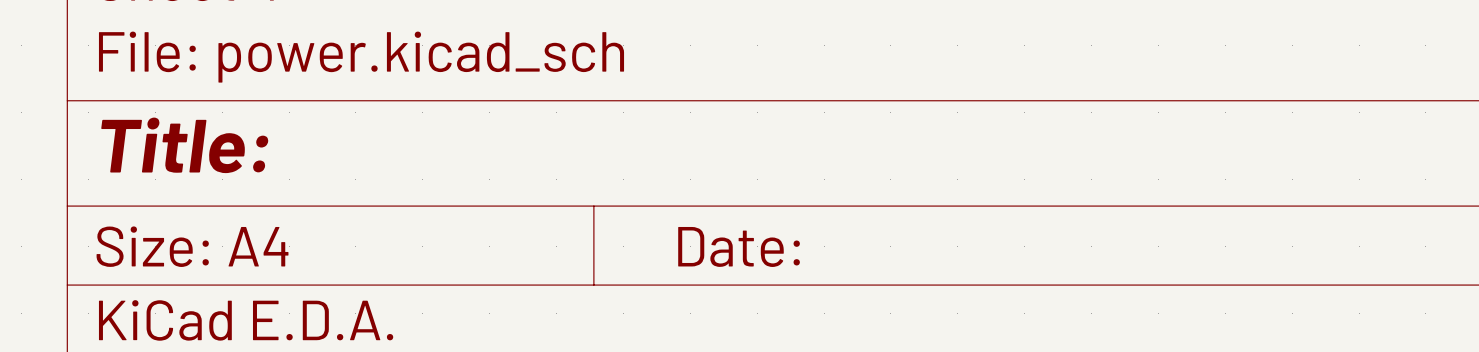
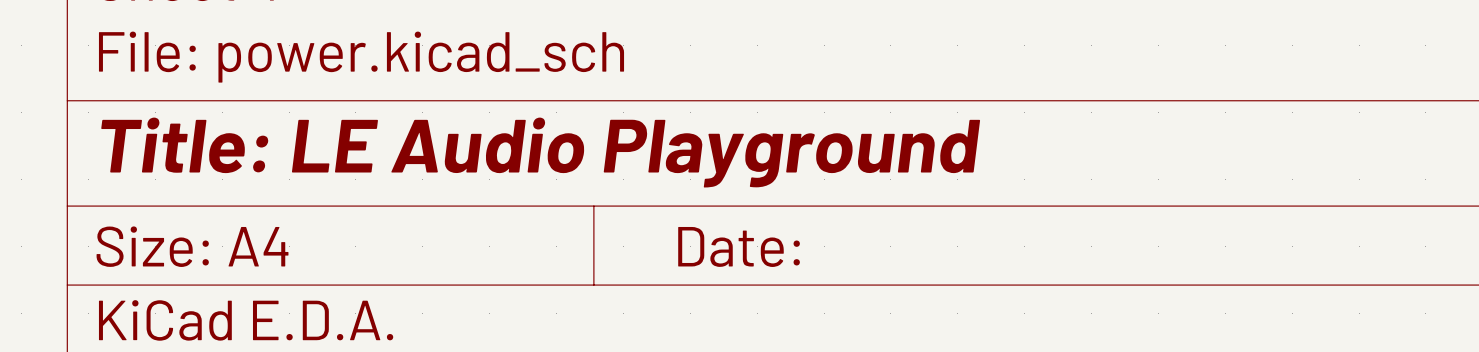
title block: Title: (184, 145) -> Title: LE Audio Playground (540, 152)

